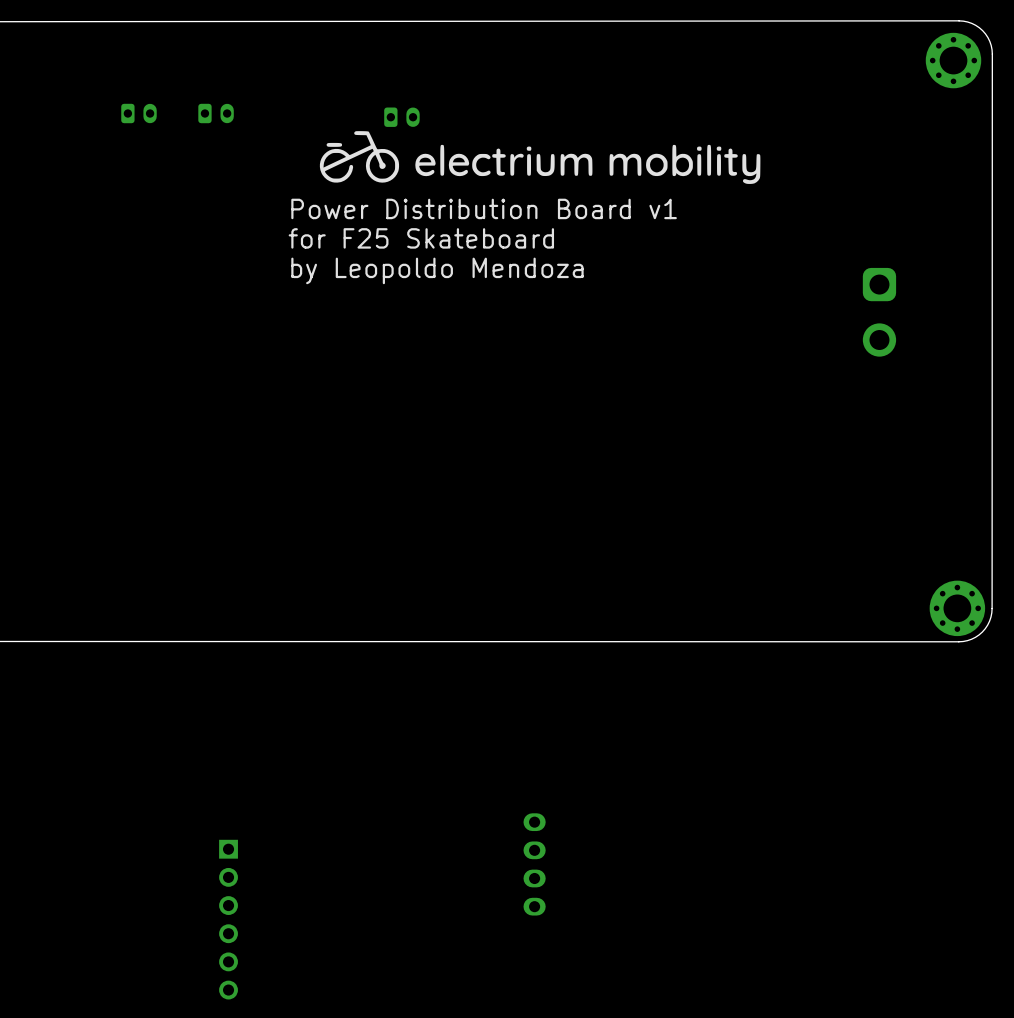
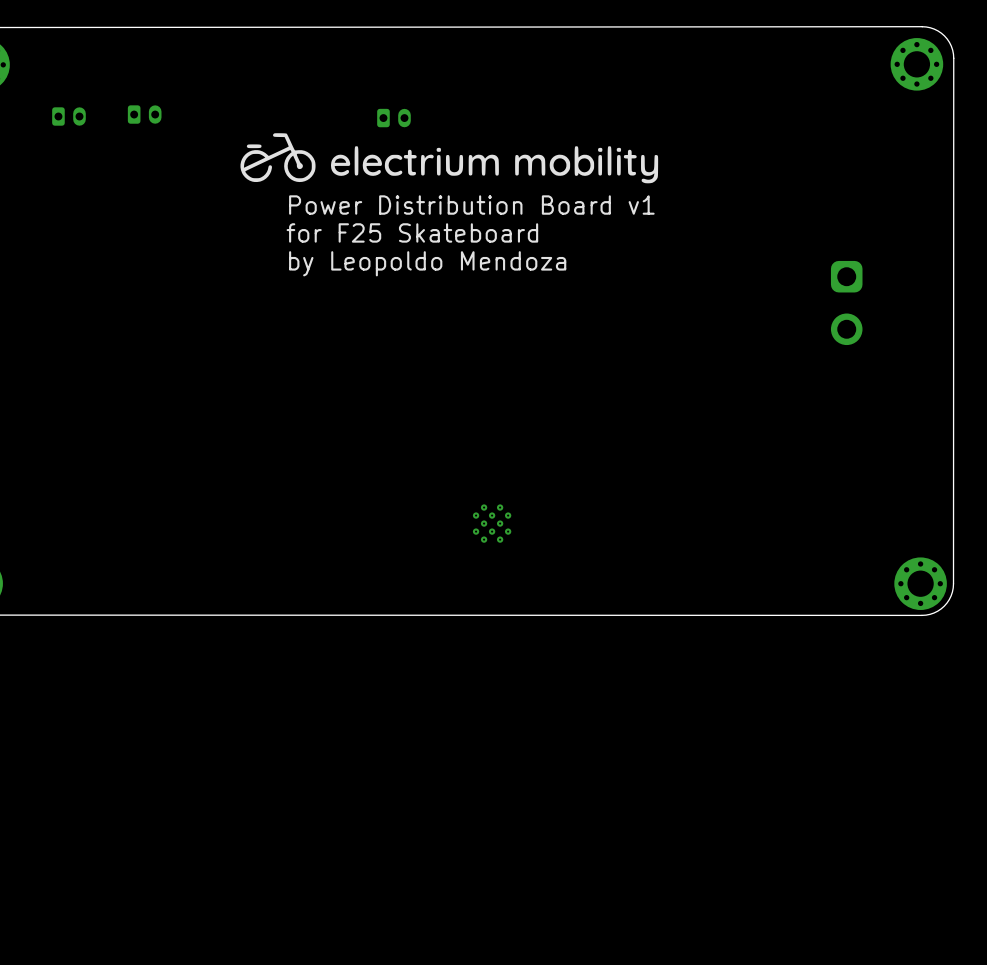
part position: (216, 113) -> (68, 116)
drawing position: (540, 157) -> (449, 158)
part: none -> (492, 523)
part: (534, 864) -> none
part: (228, 919) -> none

